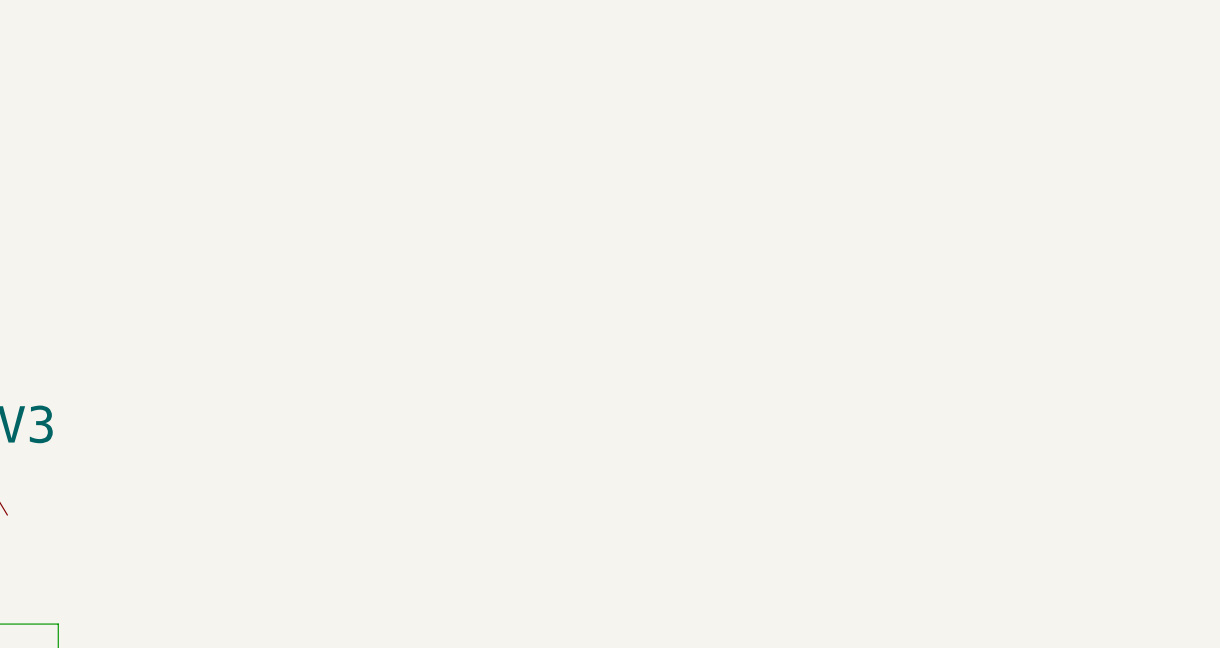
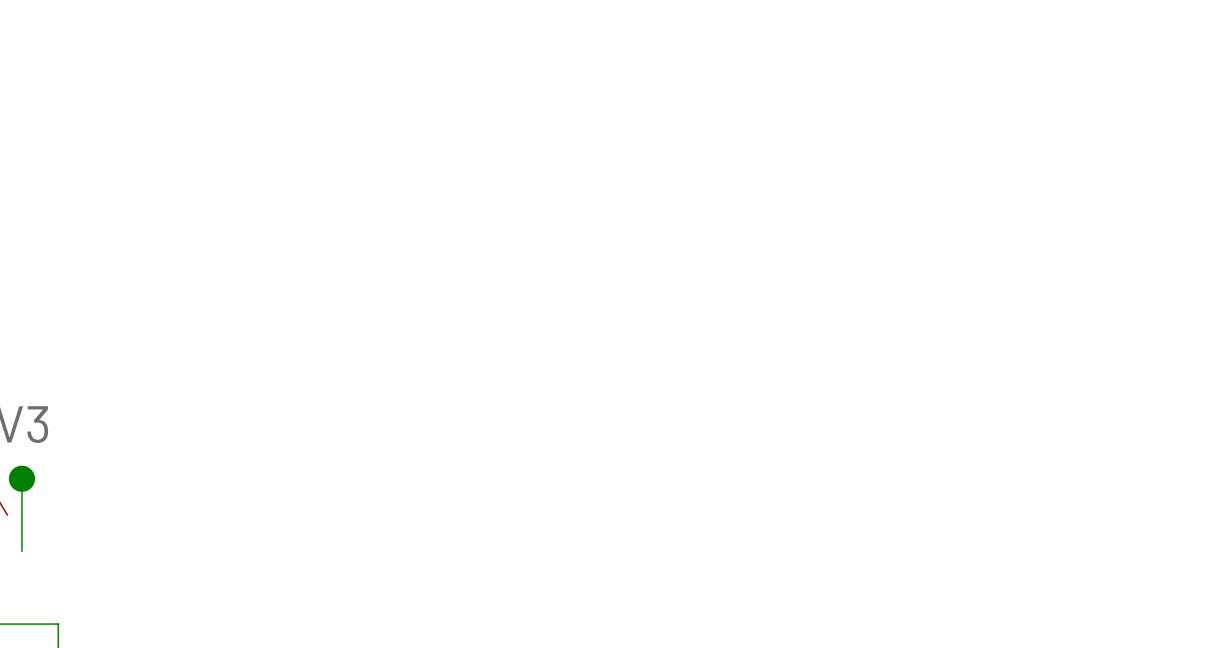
wire: none -> (21, 478) (21, 551)
junction: none -> (21, 478)

